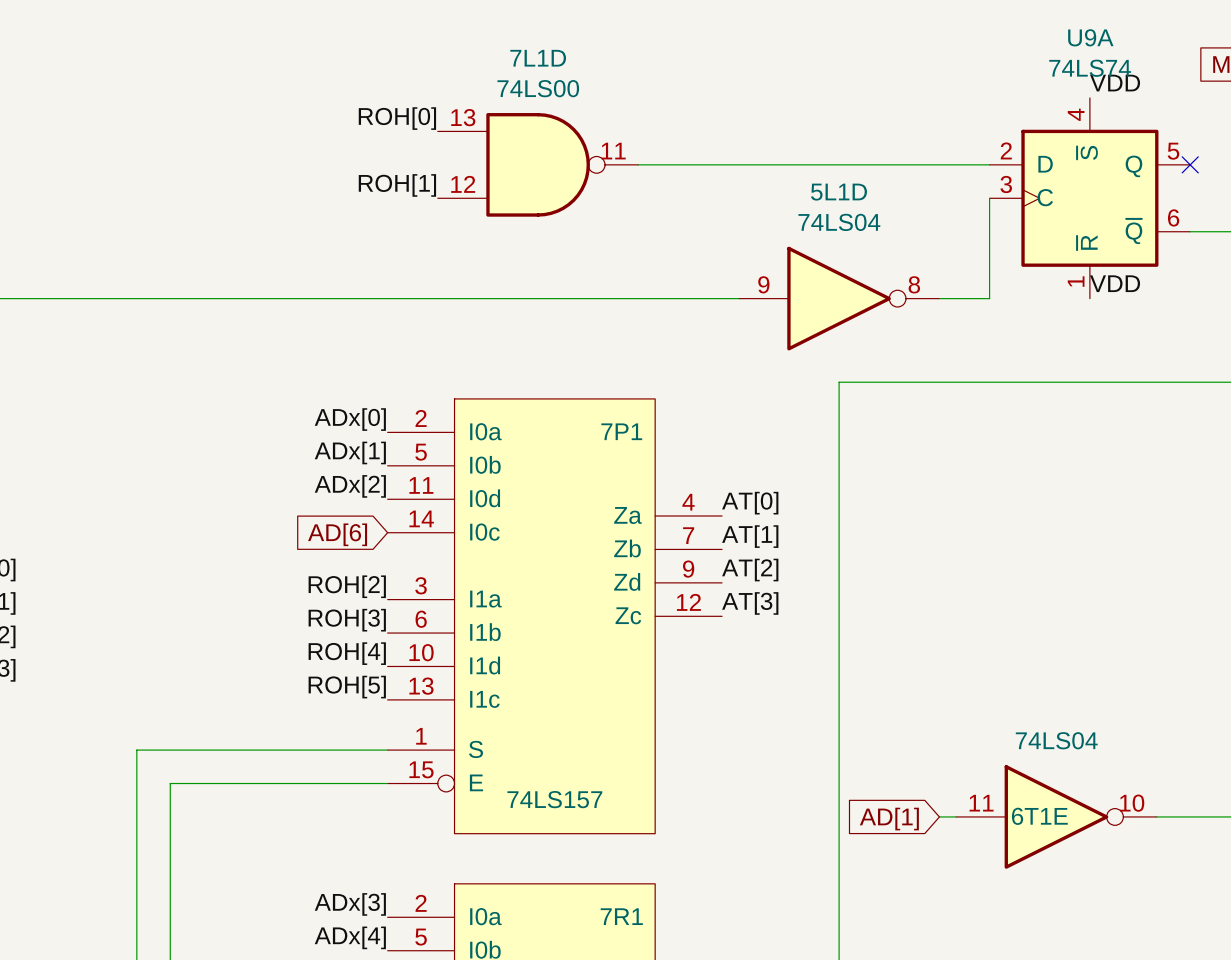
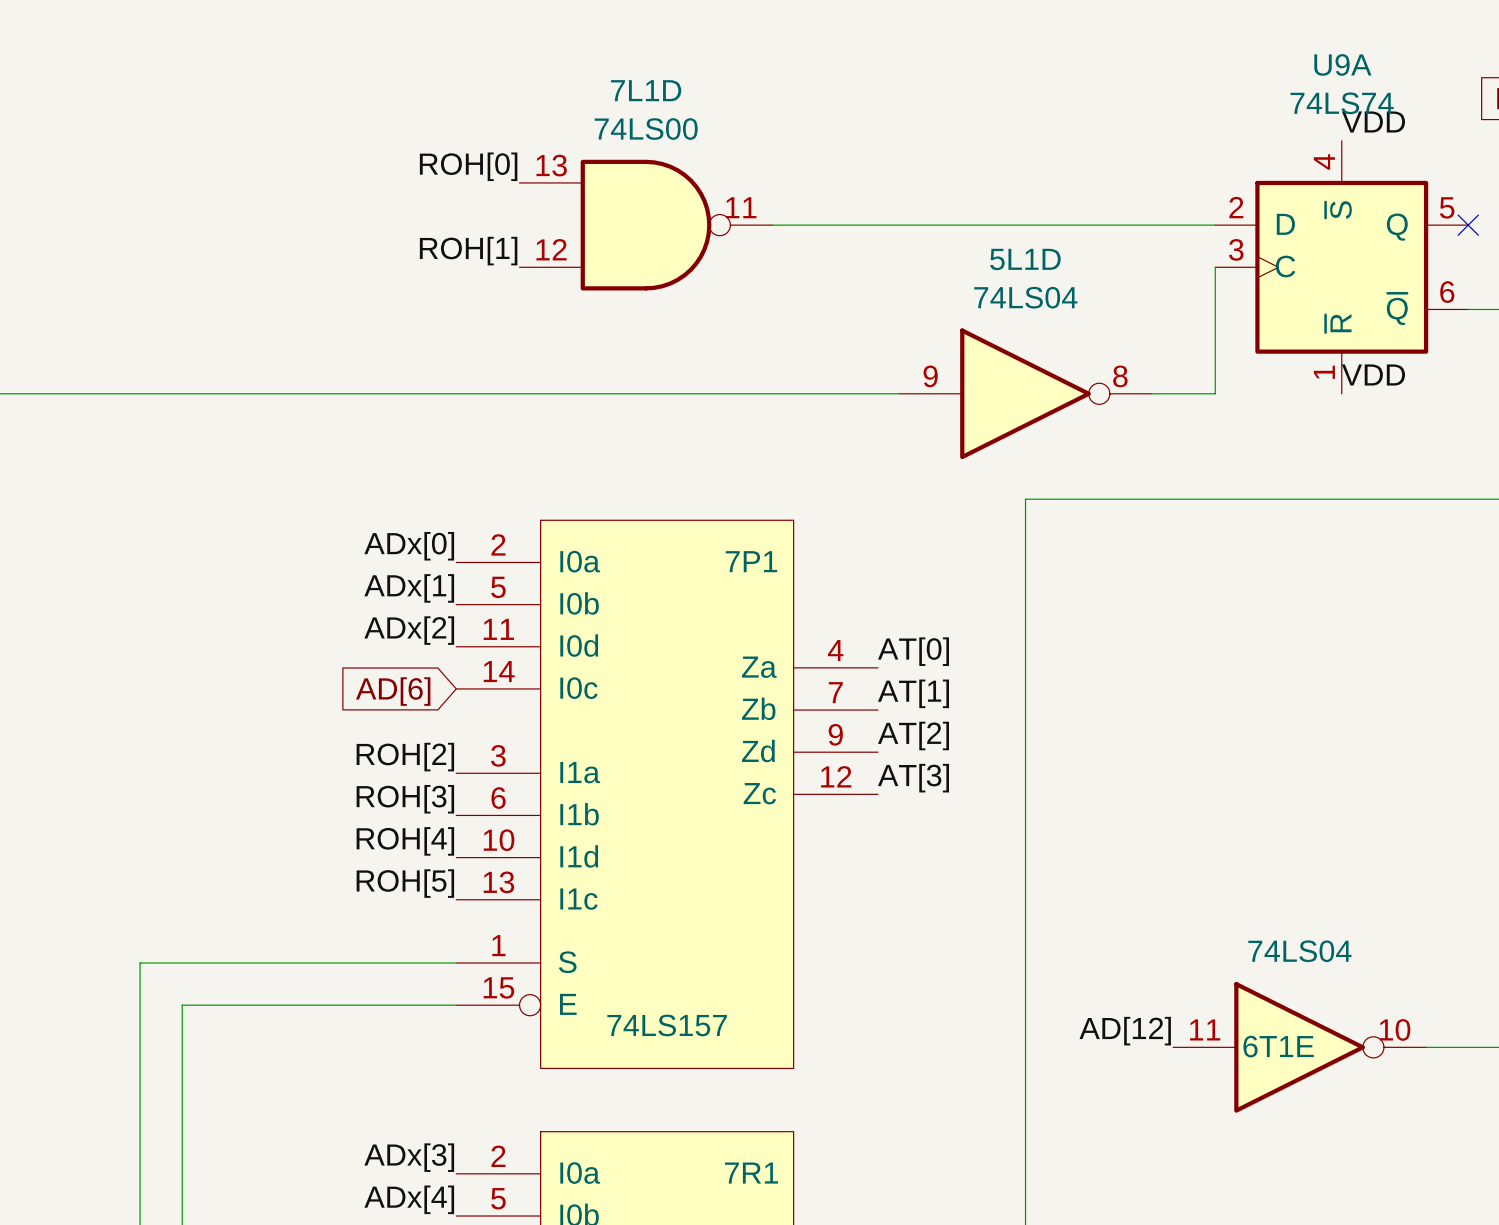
label: none -> AD[12] (1125, 1031)
wire: (939, 816) (956, 816) -> none
global label: AD[1] (889, 819) -> none

